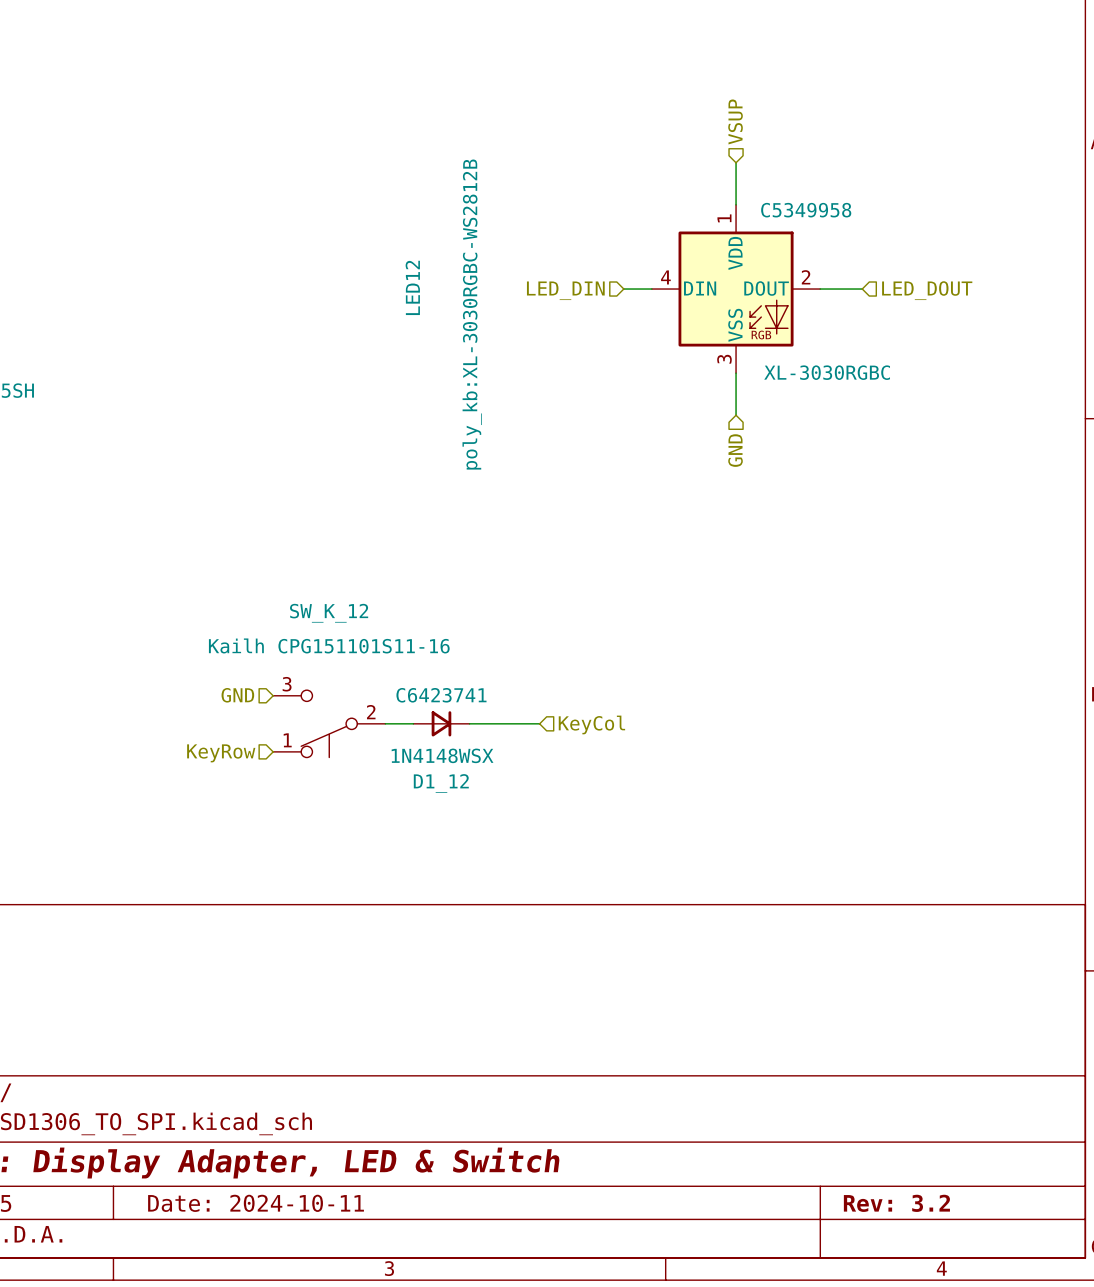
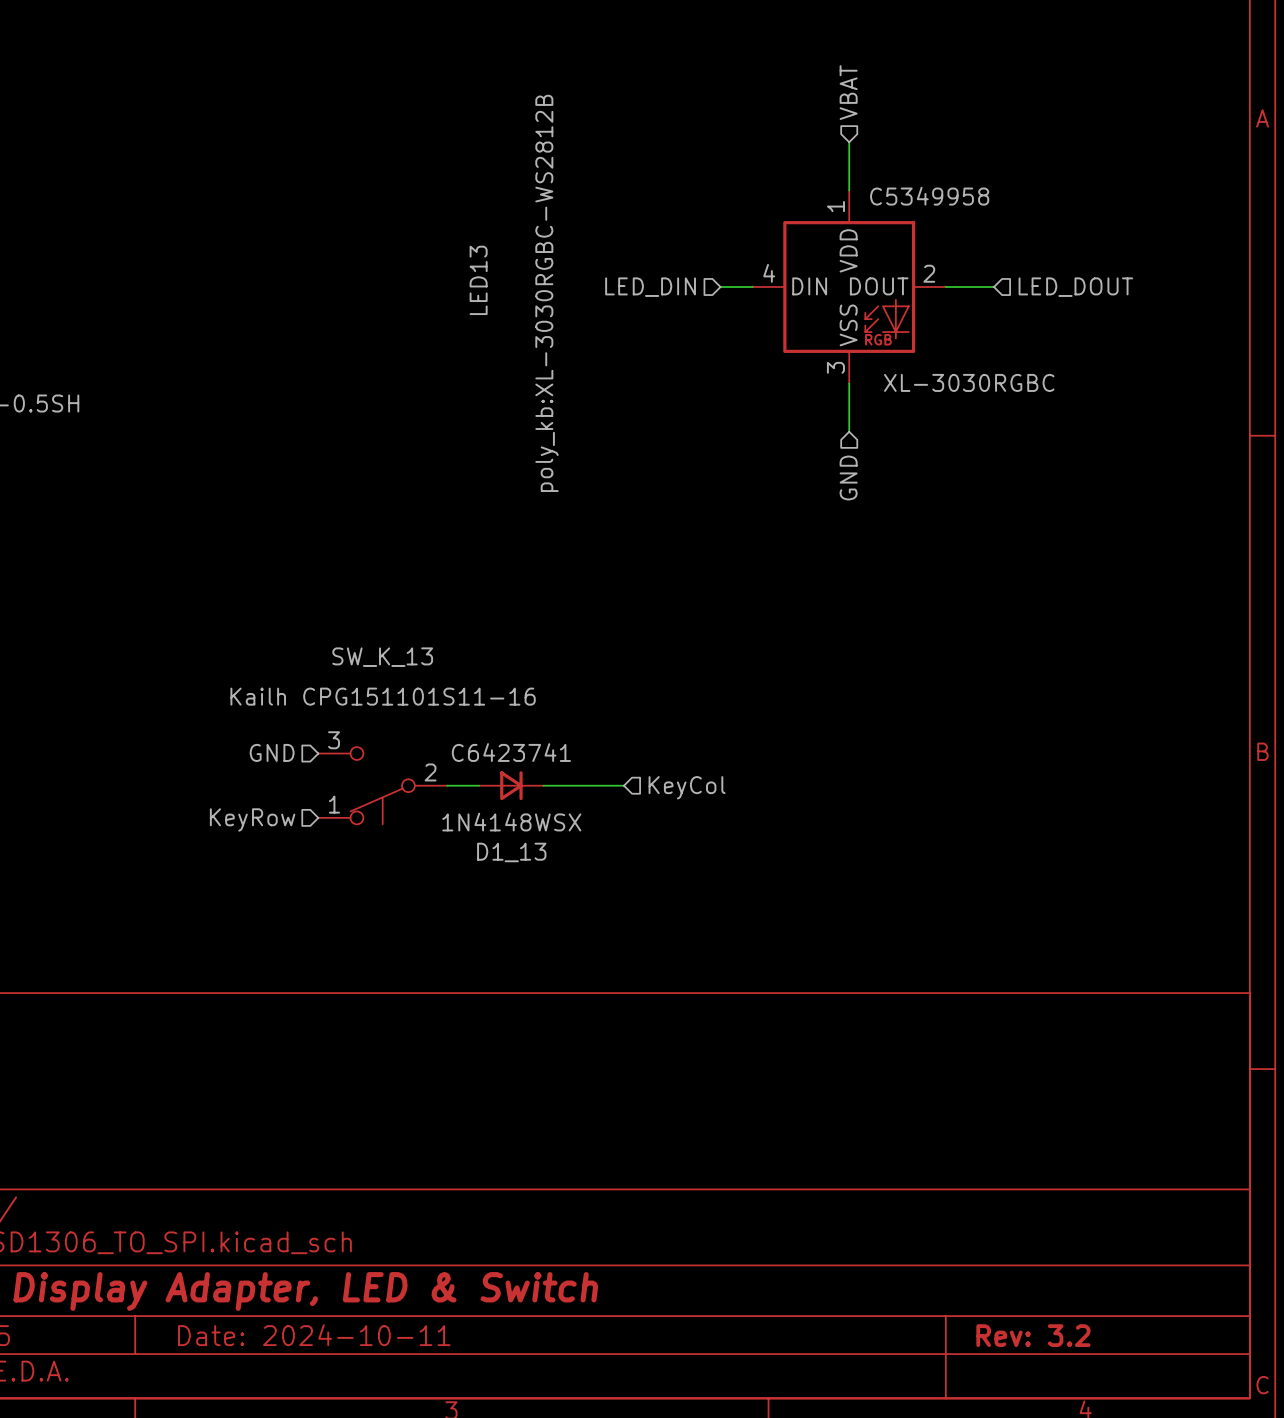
hierarchical label: VSUP (735, 121) -> VBAT (848, 92)
LED12 name: LED12 (412, 287) -> LED13 (478, 280)
SW_K_12 name: SW_K_12 (329, 613) -> SW_K_13 (382, 657)
D1_12 name: D1_12 (441, 783) -> D1_13 (511, 852)

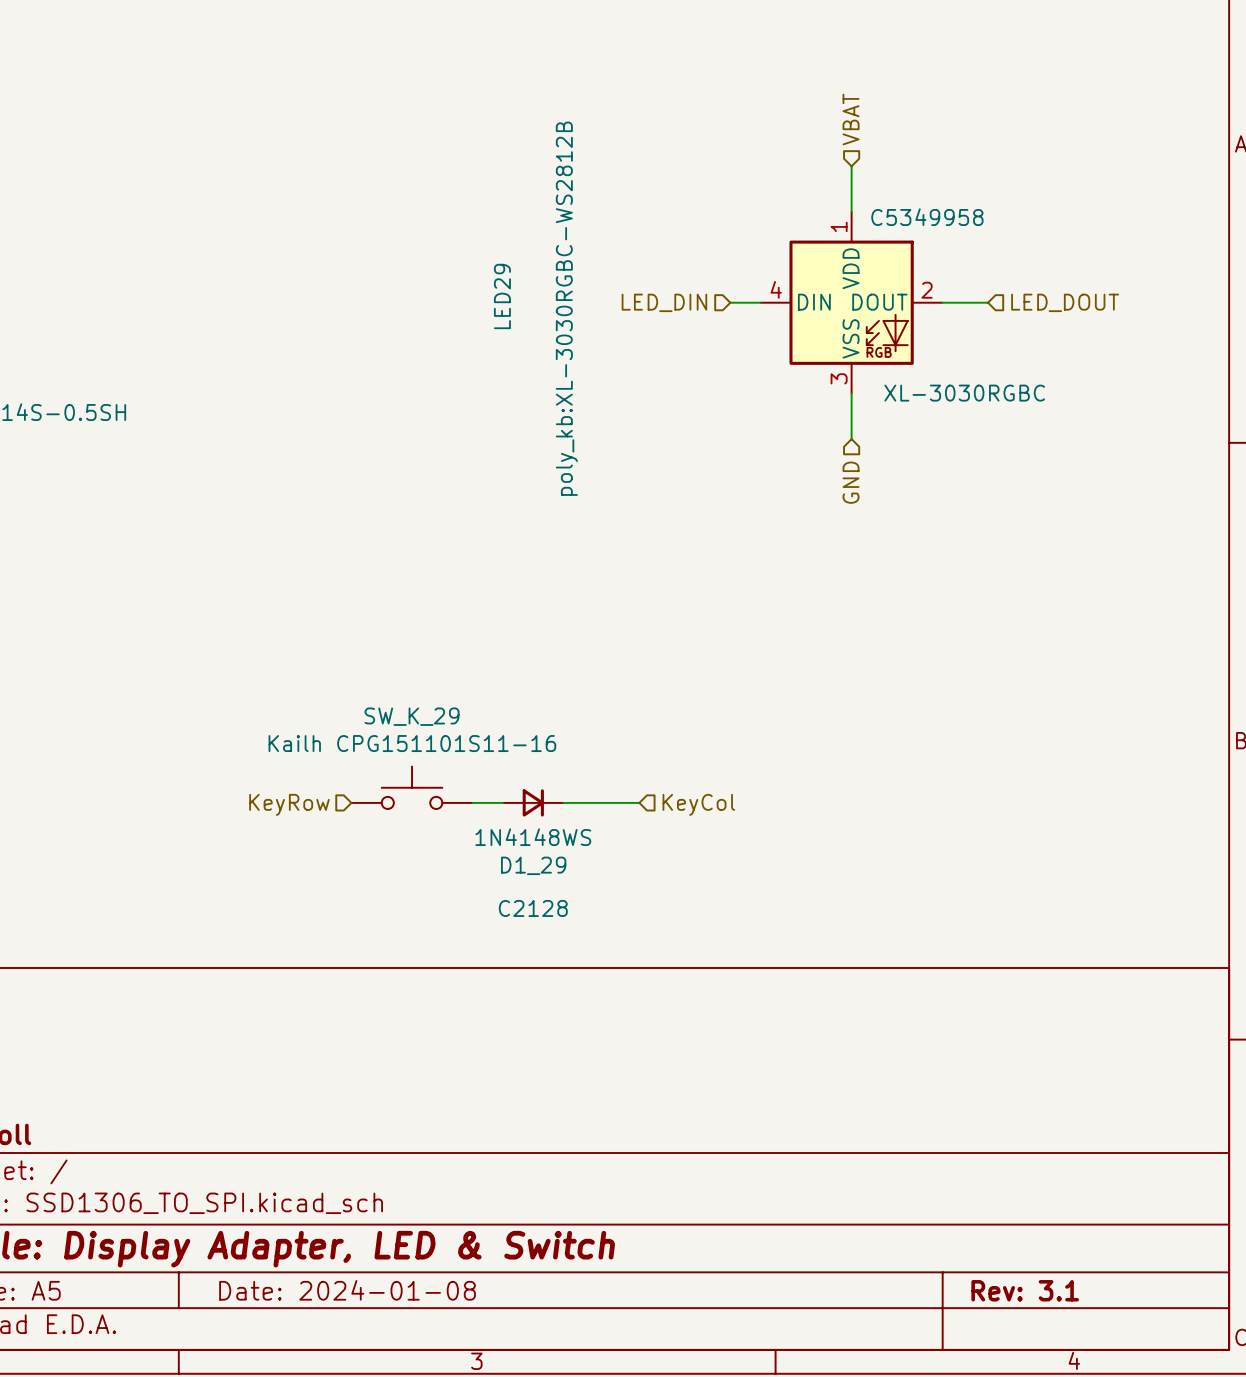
LED13 name: LED13 (478, 280) -> LED29 (502, 296)
hierarchical label: GND (272, 752) -> none
SW_K_13: Kailh CPG151101S11-16 (382, 785) -> none
wire: (447, 785) (479, 785) -> (472, 802) (502, 802)
D1_13: 1N4148WSX (511, 785) -> none
wire: (543, 785) (624, 785) -> (563, 802) (639, 802)
hierarchical label position: KeyCol (687, 787) -> KeyCol (698, 804)
SW_K_29: none -> Kailh CPG151101S11-16 (412, 787)
D1_29: none -> 1N4148WS (533, 802)
title block: Date: 2024-10-11 (314, 1335) -> Date: 2024-01-08 (347, 1290)
title block: Rev: 3.2 (1033, 1335) -> Rev: 3.1 (1025, 1290)

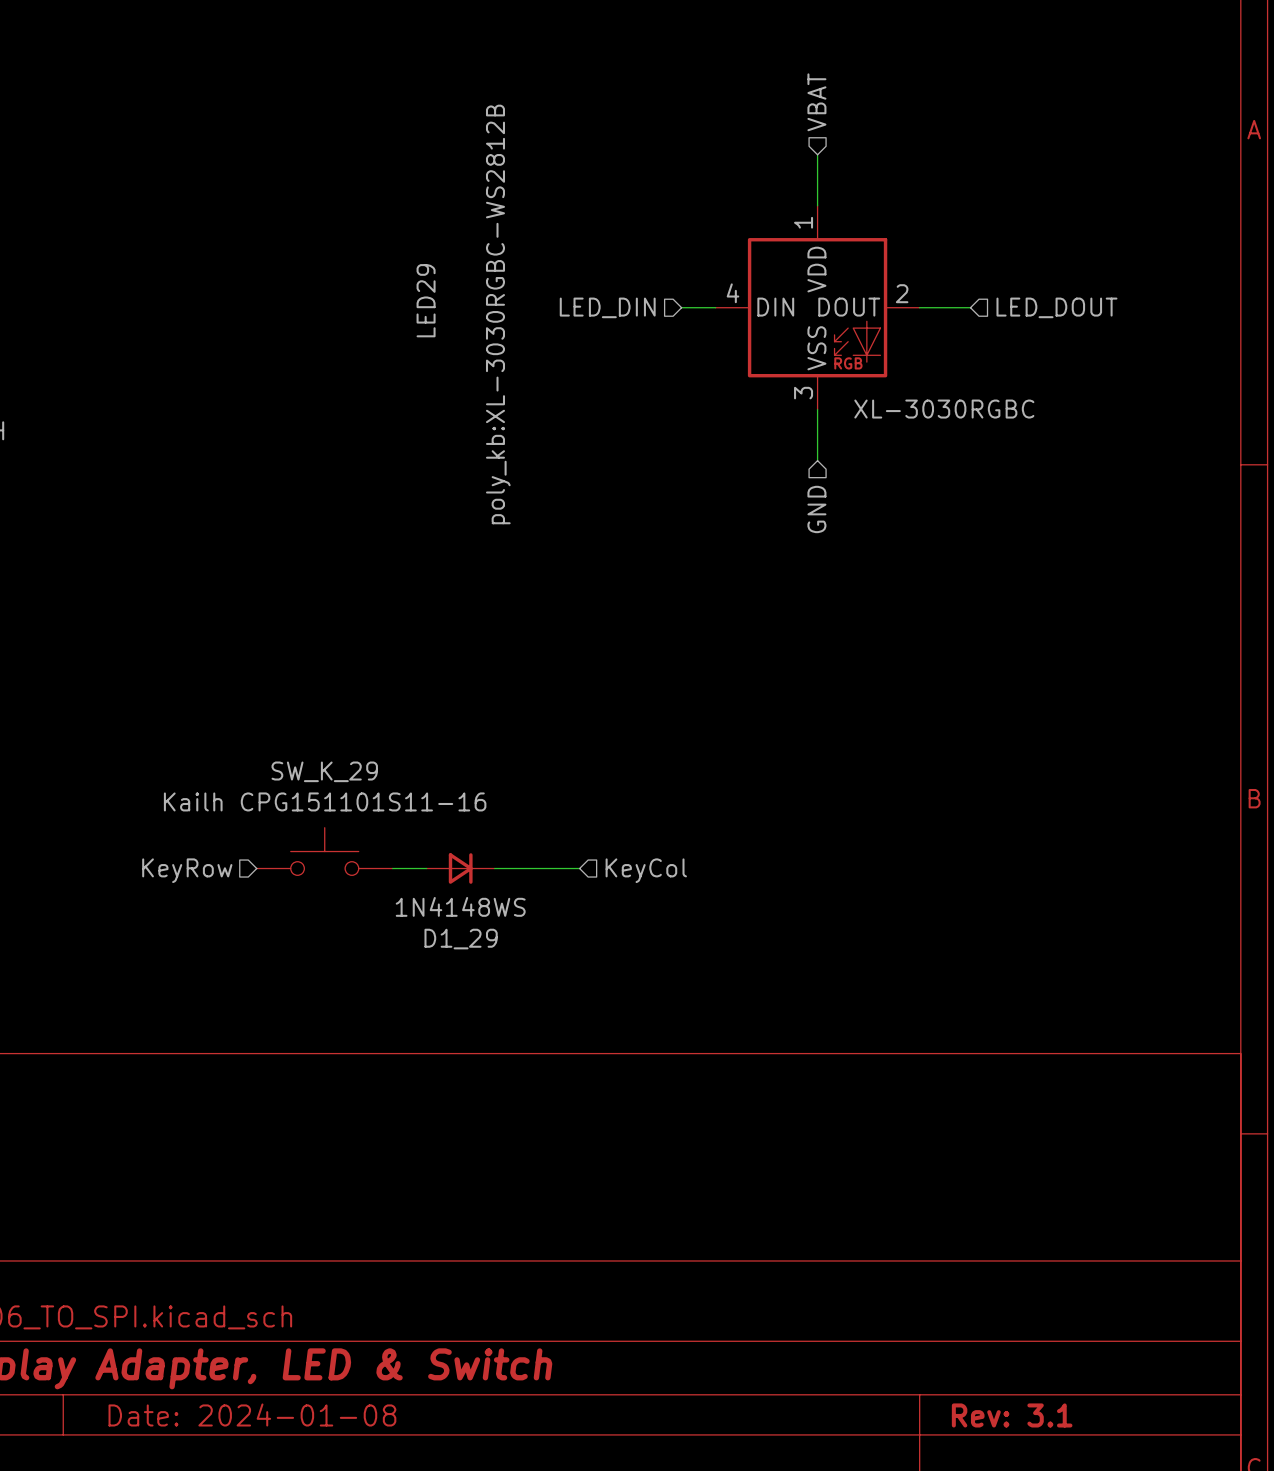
LED29 text: C5349958 (927, 217) -> none
D1_29 text: C2128 (533, 908) -> none

